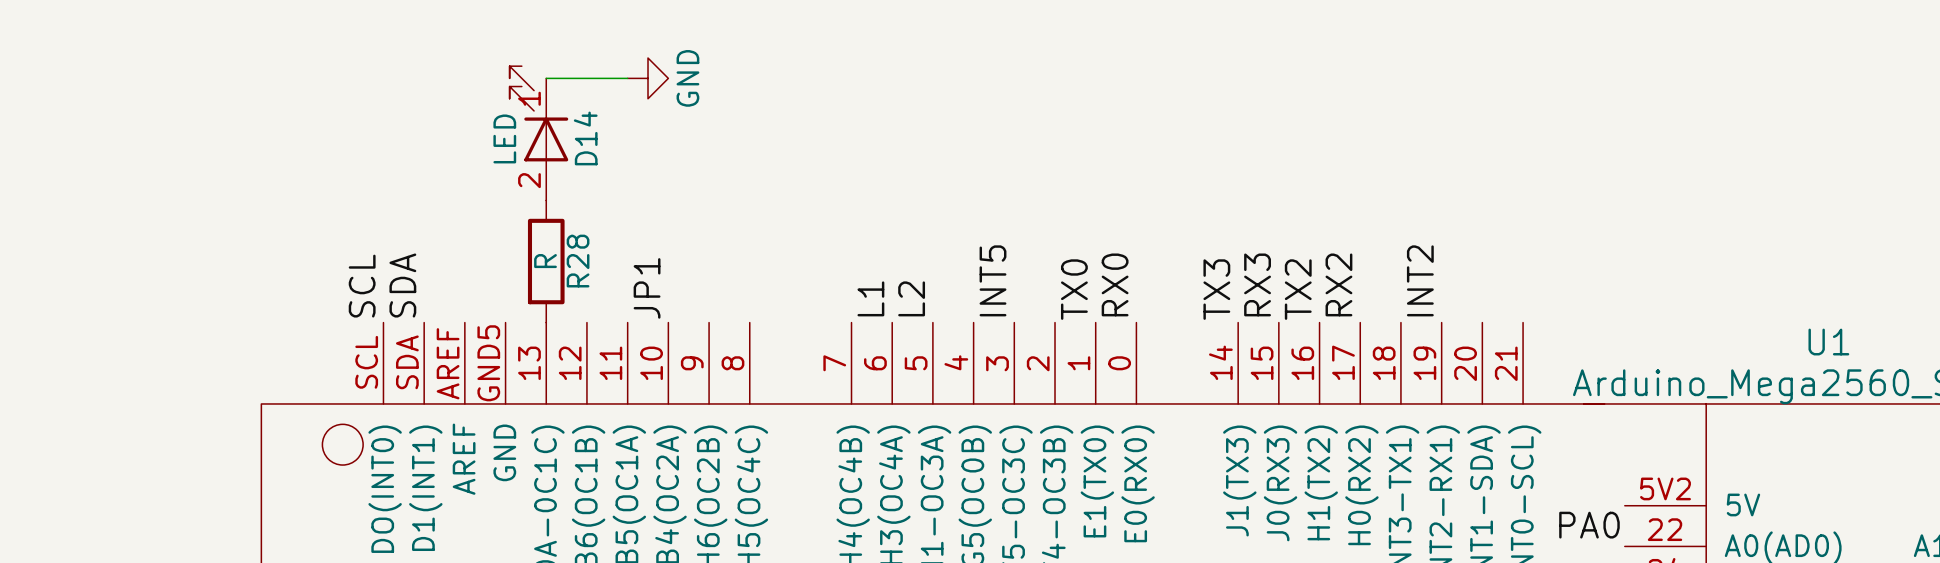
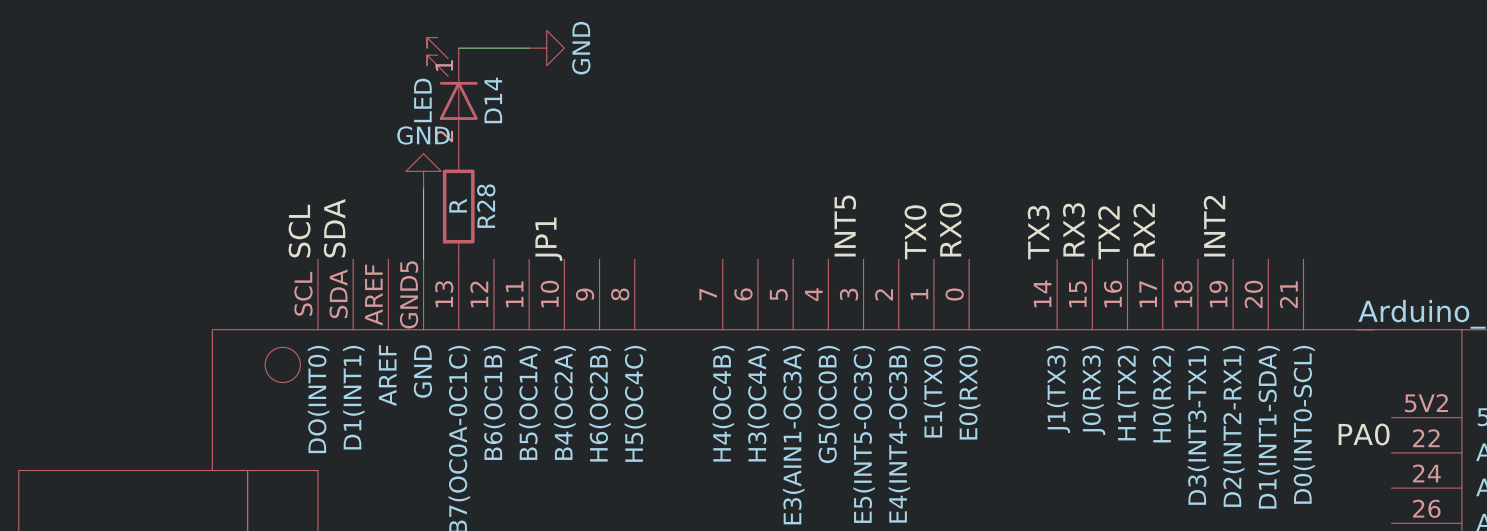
power symbol: none -> GND (423, 171)
wire: none -> (423, 188) (423, 259)
label: L1 (870, 298) -> none
label: L2 (911, 298) -> none

